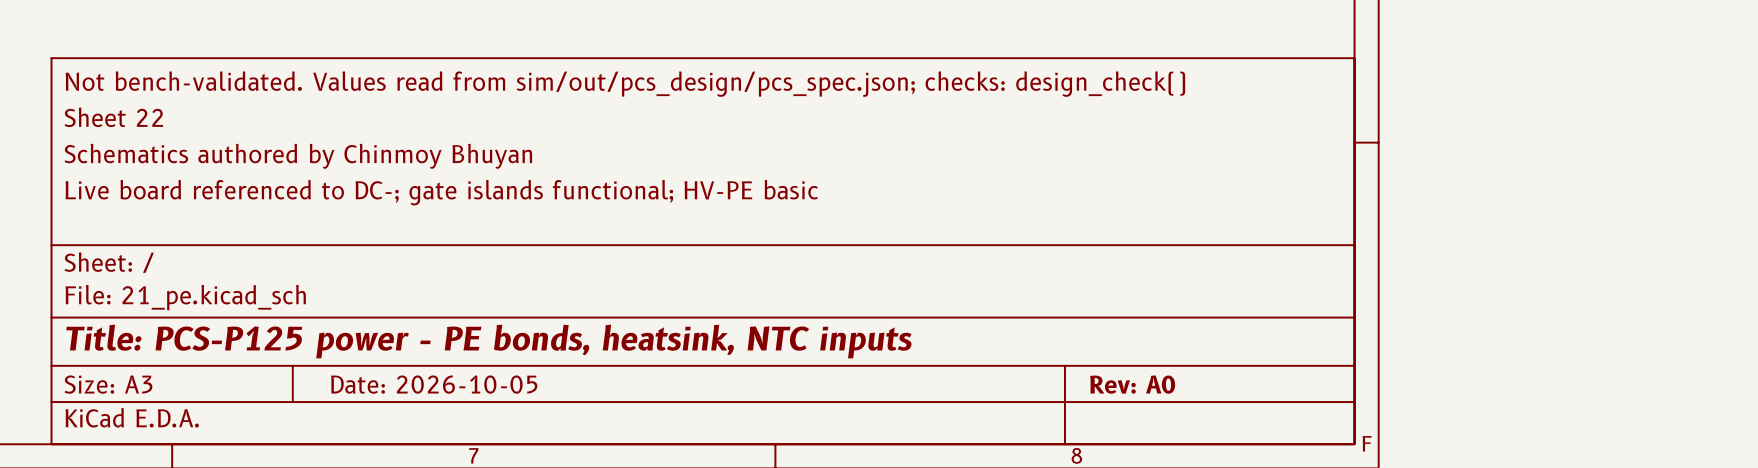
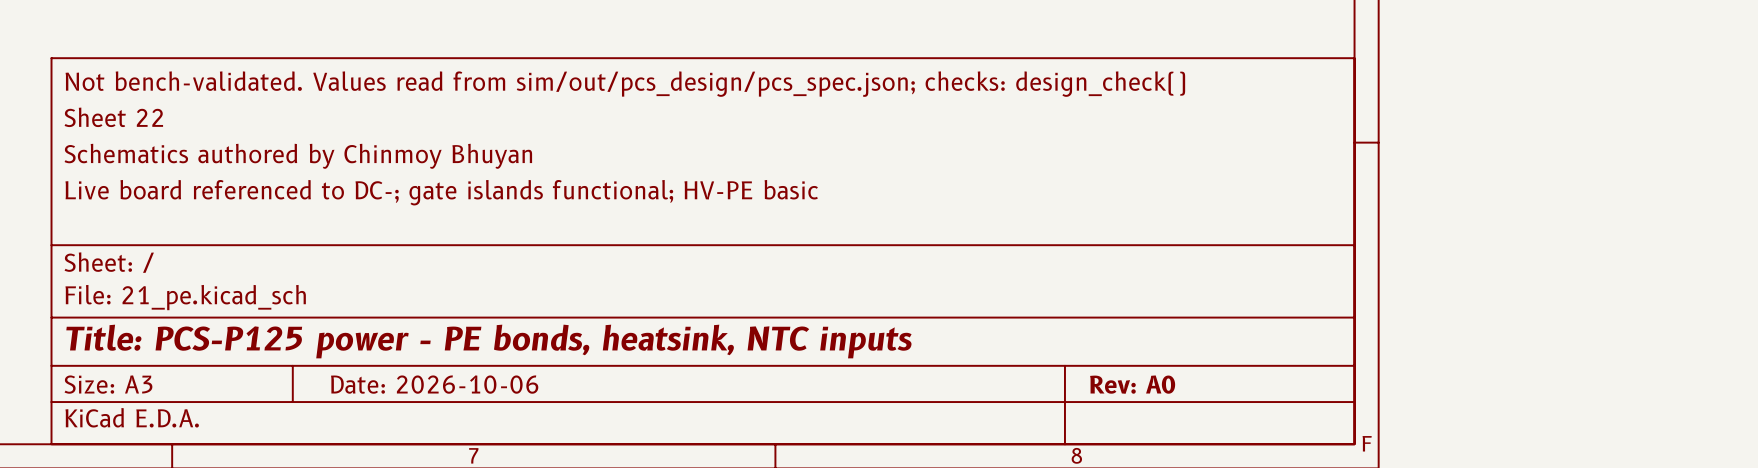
title block: Date: 2026-10-05 (434, 384) -> Date: 2026-10-06 (434, 384)

